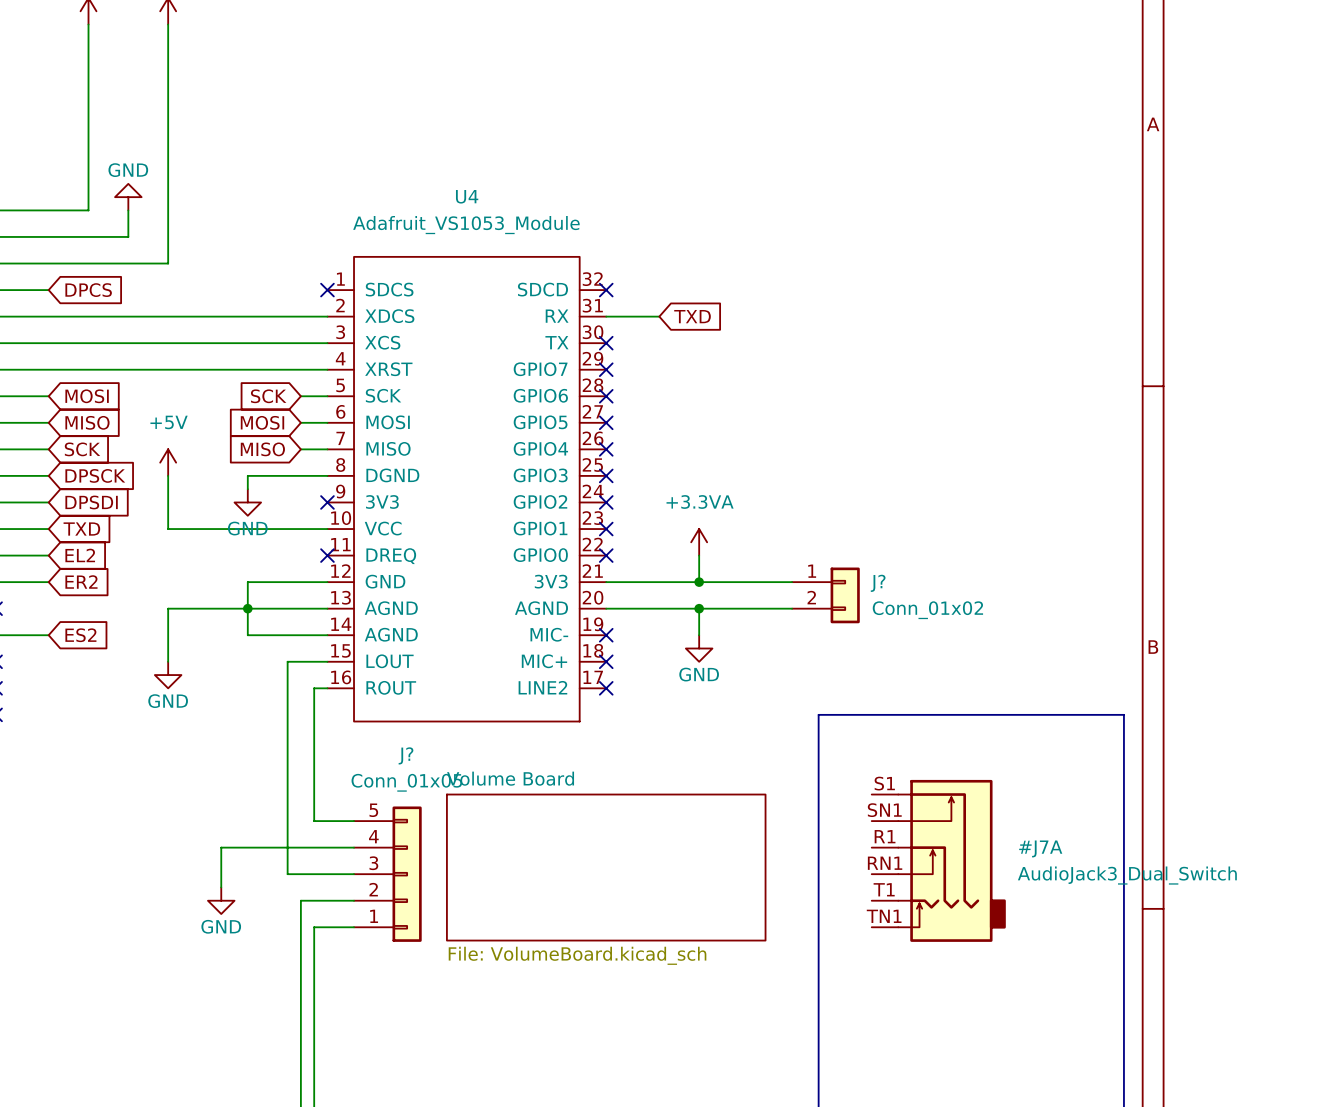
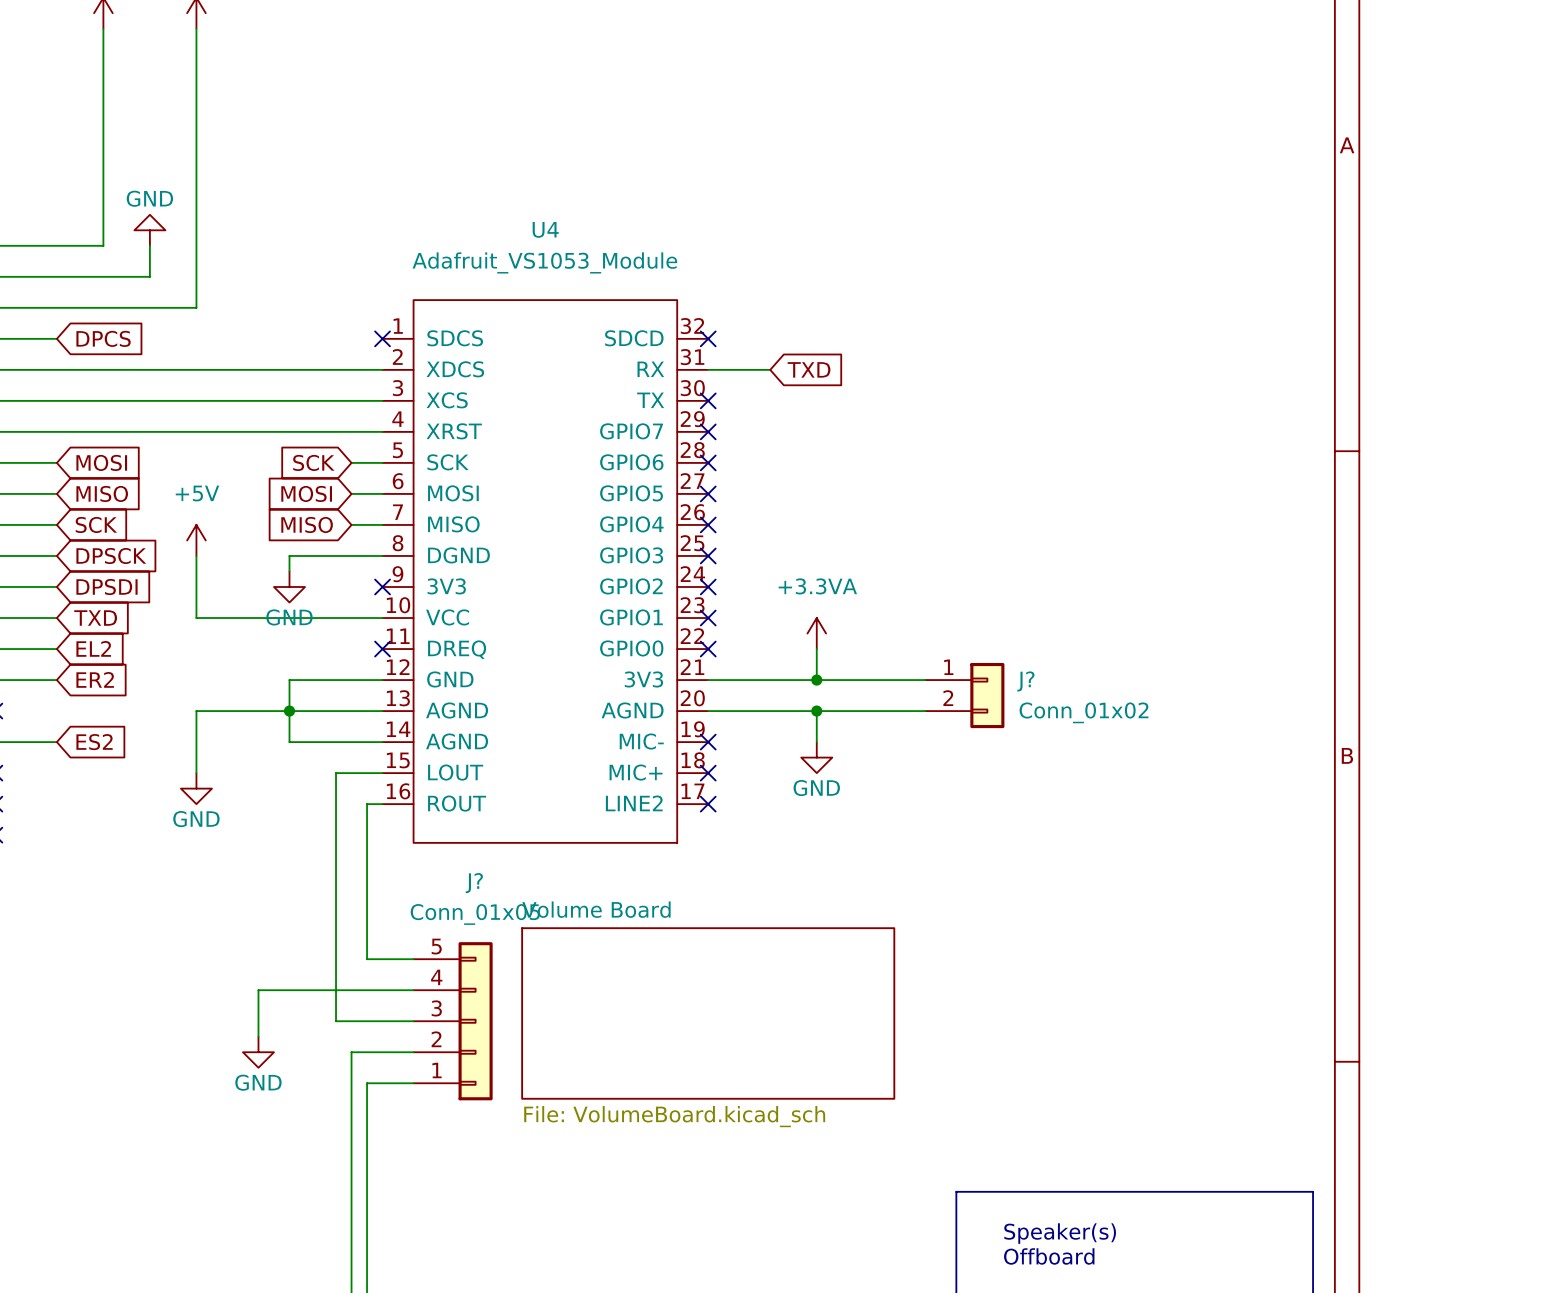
#J7A: AudioJack3_Dual_Switch (938, 860) -> none
line: (818, 1020) (818, 714) (1123, 714) (1123, 1020) -> (956, 1191) (1313, 1191)
text: none -> Speaker(s) (1060, 1233)
text: none -> Offboard (1049, 1256)

